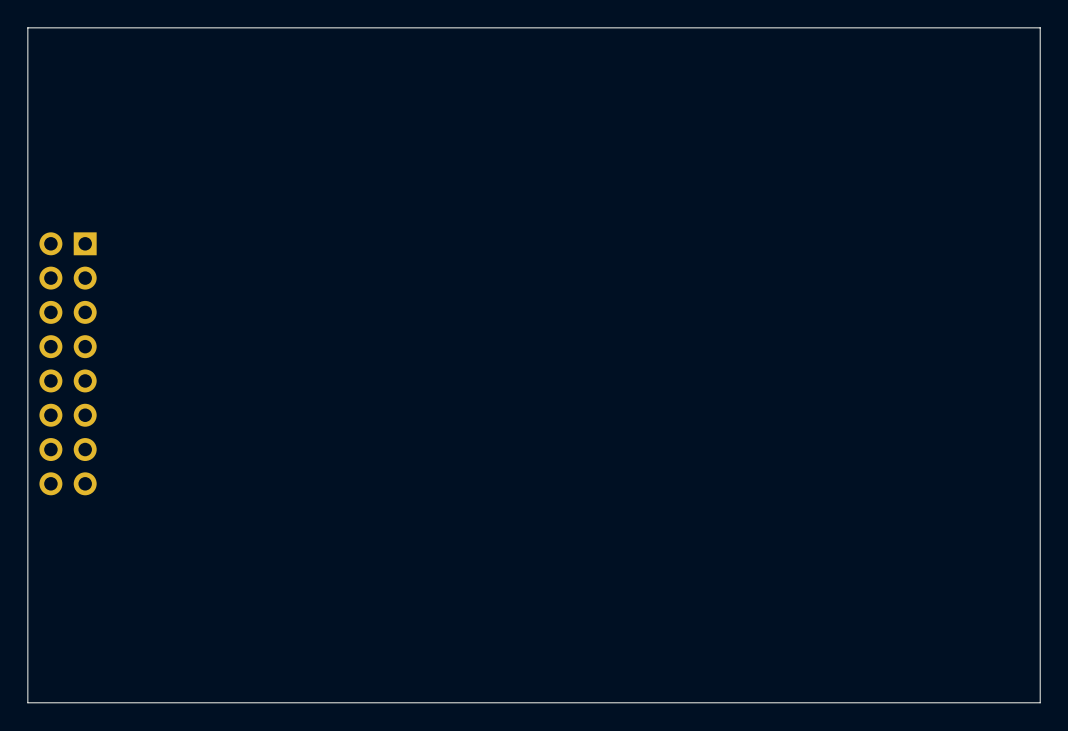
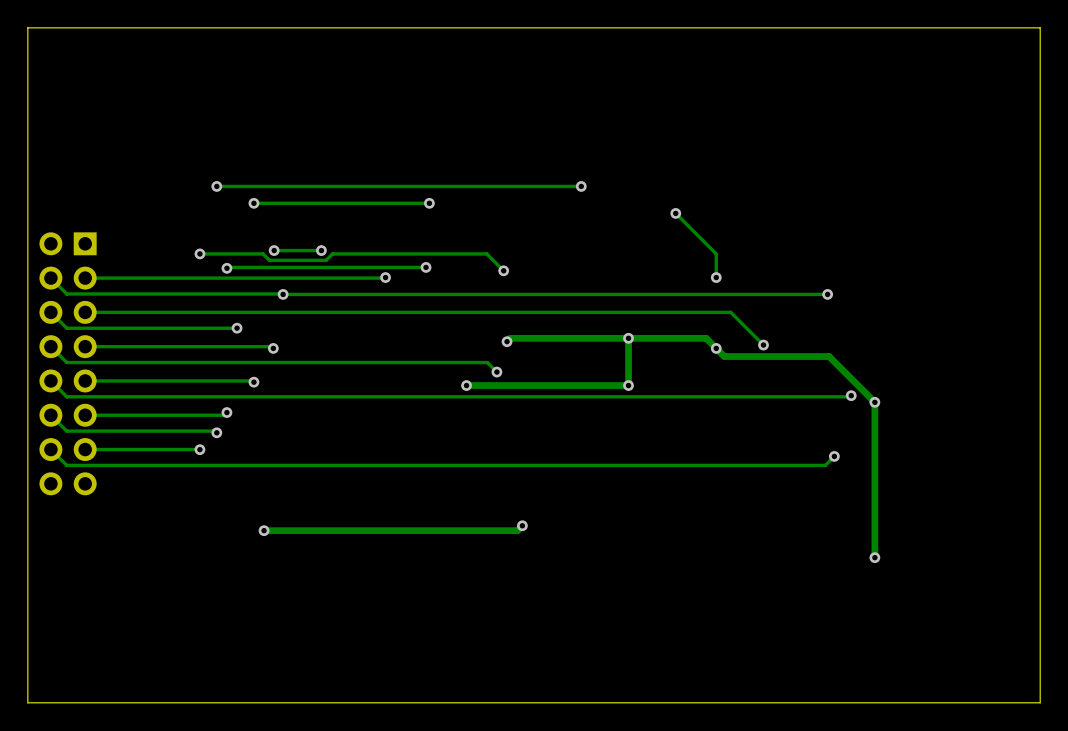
via: none -> (216, 186)
track: none -> (581, 186) (216, 186)
via: none -> (581, 186)
via: none -> (253, 203)
track: none -> (429, 203) (253, 203)
via: none -> (429, 203)
track: none -> (675, 213) (716, 253) (716, 277)
via: none -> (675, 213)
via: none -> (274, 250)
track: none -> (321, 250) (274, 250)
via: none -> (321, 250)
track: none -> (199, 253) (263, 253) (269, 260) (326, 260) (332, 253) (486, 253) (503, 270)
via: none -> (199, 253)
track: none -> (426, 267) (226, 268)
via: none -> (426, 267)
via: none -> (226, 268)
via: none -> (503, 270)
track: none -> (385, 277) (85, 278)
via: none -> (385, 277)
via: none -> (716, 277)
track: none -> (50, 278) (66, 293) (827, 294)
via: none -> (283, 294)
via: none -> (827, 294)
track: none -> (50, 312) (66, 328) (236, 328)
track: none -> (85, 312) (730, 312) (763, 345)
via: none -> (237, 328)
track: none -> (628, 338) (628, 385) (466, 385)
via: none -> (628, 338)
track: none -> (507, 341) (510, 338) (706, 338) (724, 356) (829, 356) (874, 402) (874, 557)
via: none -> (507, 341)
via: none -> (763, 345)
track: none -> (50, 346) (66, 362) (487, 362) (496, 372)
track: none -> (85, 346) (271, 346) (273, 348)
via: none -> (273, 348)
via: none -> (716, 348)
via: none -> (496, 372)
track: none -> (50, 380) (66, 396) (851, 395)
track: none -> (85, 380) (253, 382)
via: none -> (253, 382)
via: none -> (466, 385)
via: none -> (628, 385)
via: none -> (851, 395)
via: none -> (874, 402)
track: none -> (226, 412) (224, 415) (85, 415)
via: none -> (226, 412)
track: none -> (50, 415) (66, 431) (215, 431) (216, 432)
via: none -> (216, 432)
track: none -> (50, 449) (66, 465) (825, 465) (834, 456)
track: none -> (199, 449) (85, 449)
via: none -> (199, 449)
via: none -> (834, 456)
track: none -> (522, 525) (517, 530) (264, 530)
via: none -> (522, 525)
via: none -> (264, 530)
via: none -> (874, 557)

